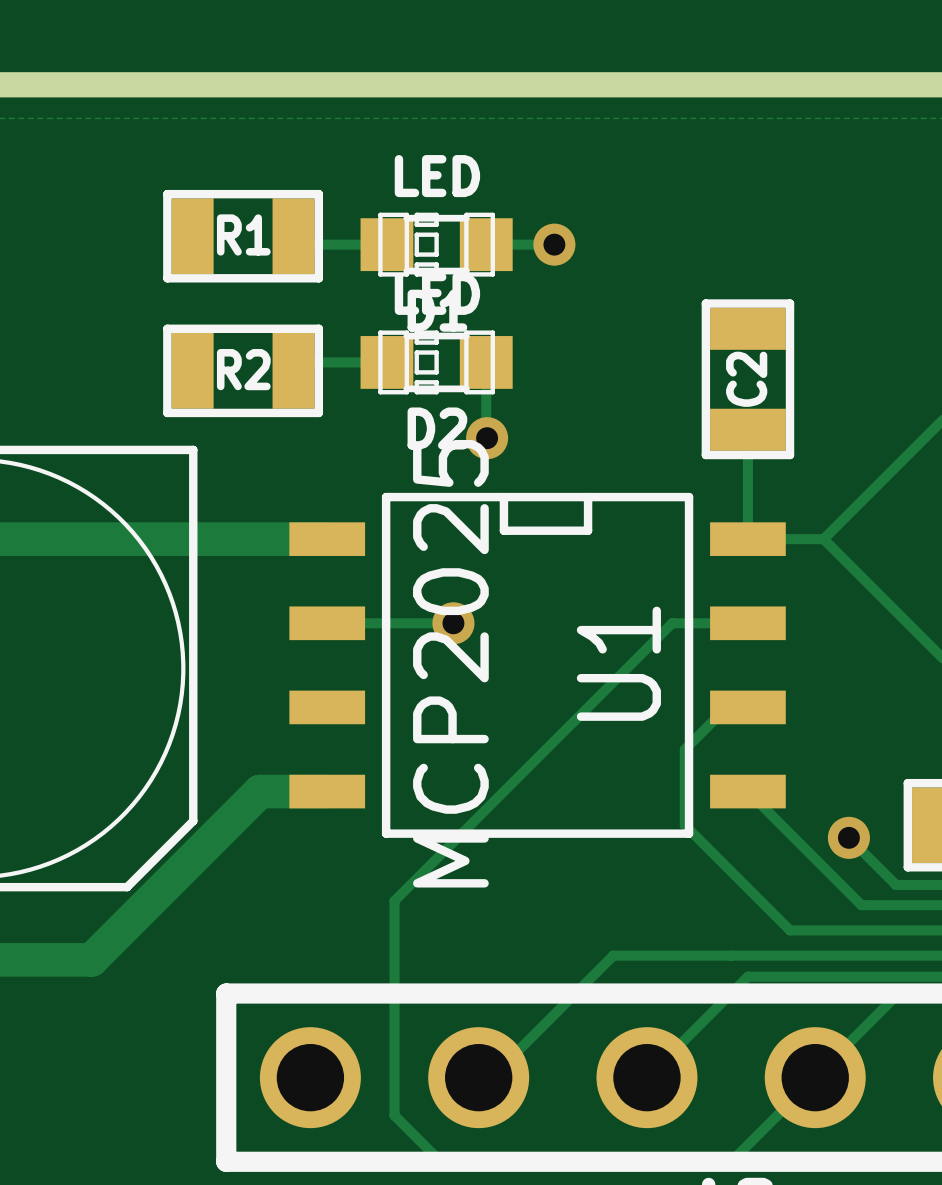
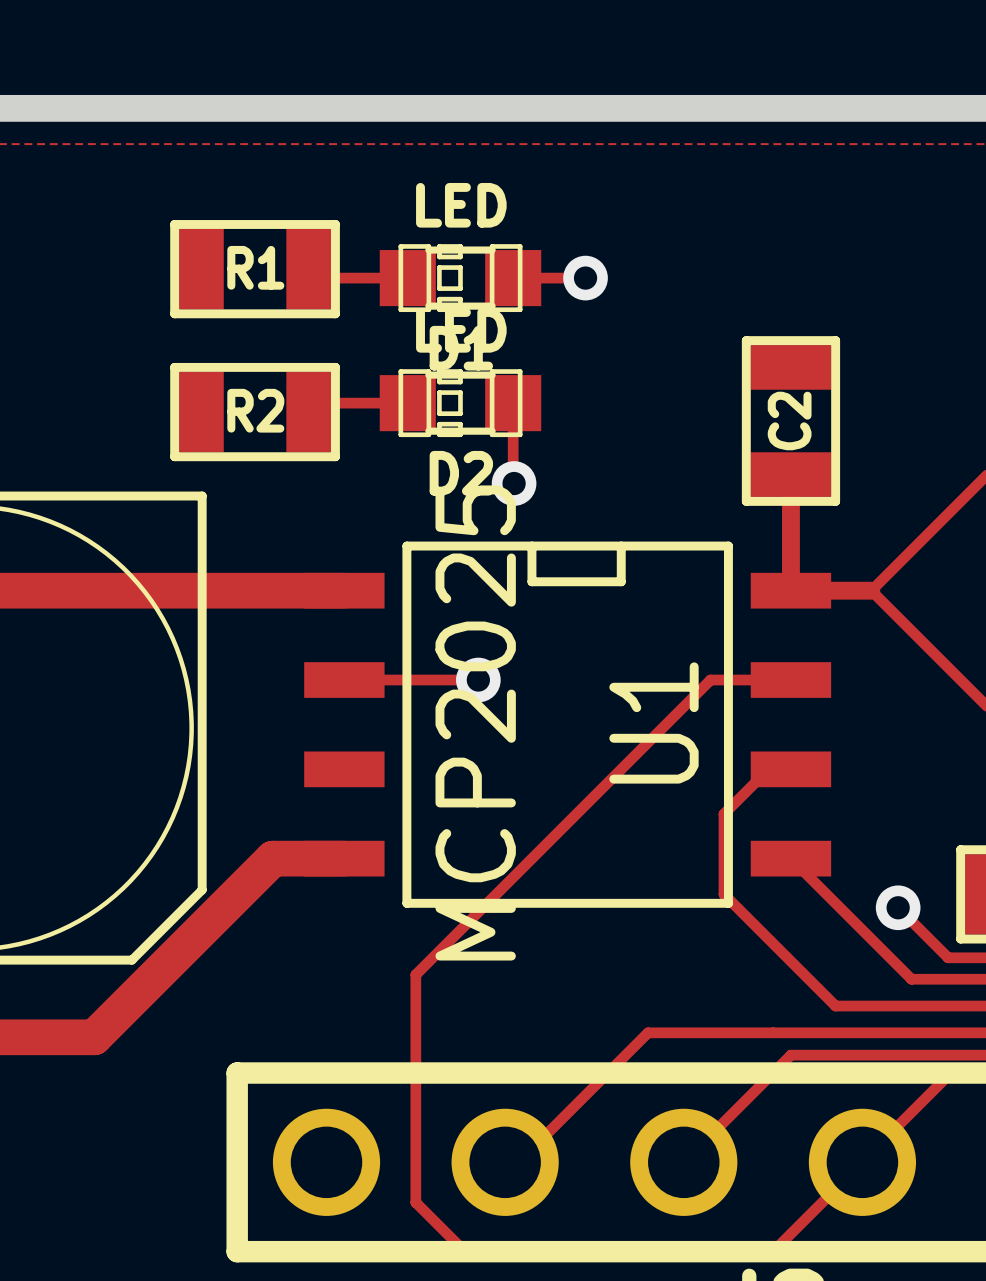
track width: thin (747, 429) (747, 539) (823, 539) -> thick (790, 474) (790, 590) (871, 590)

